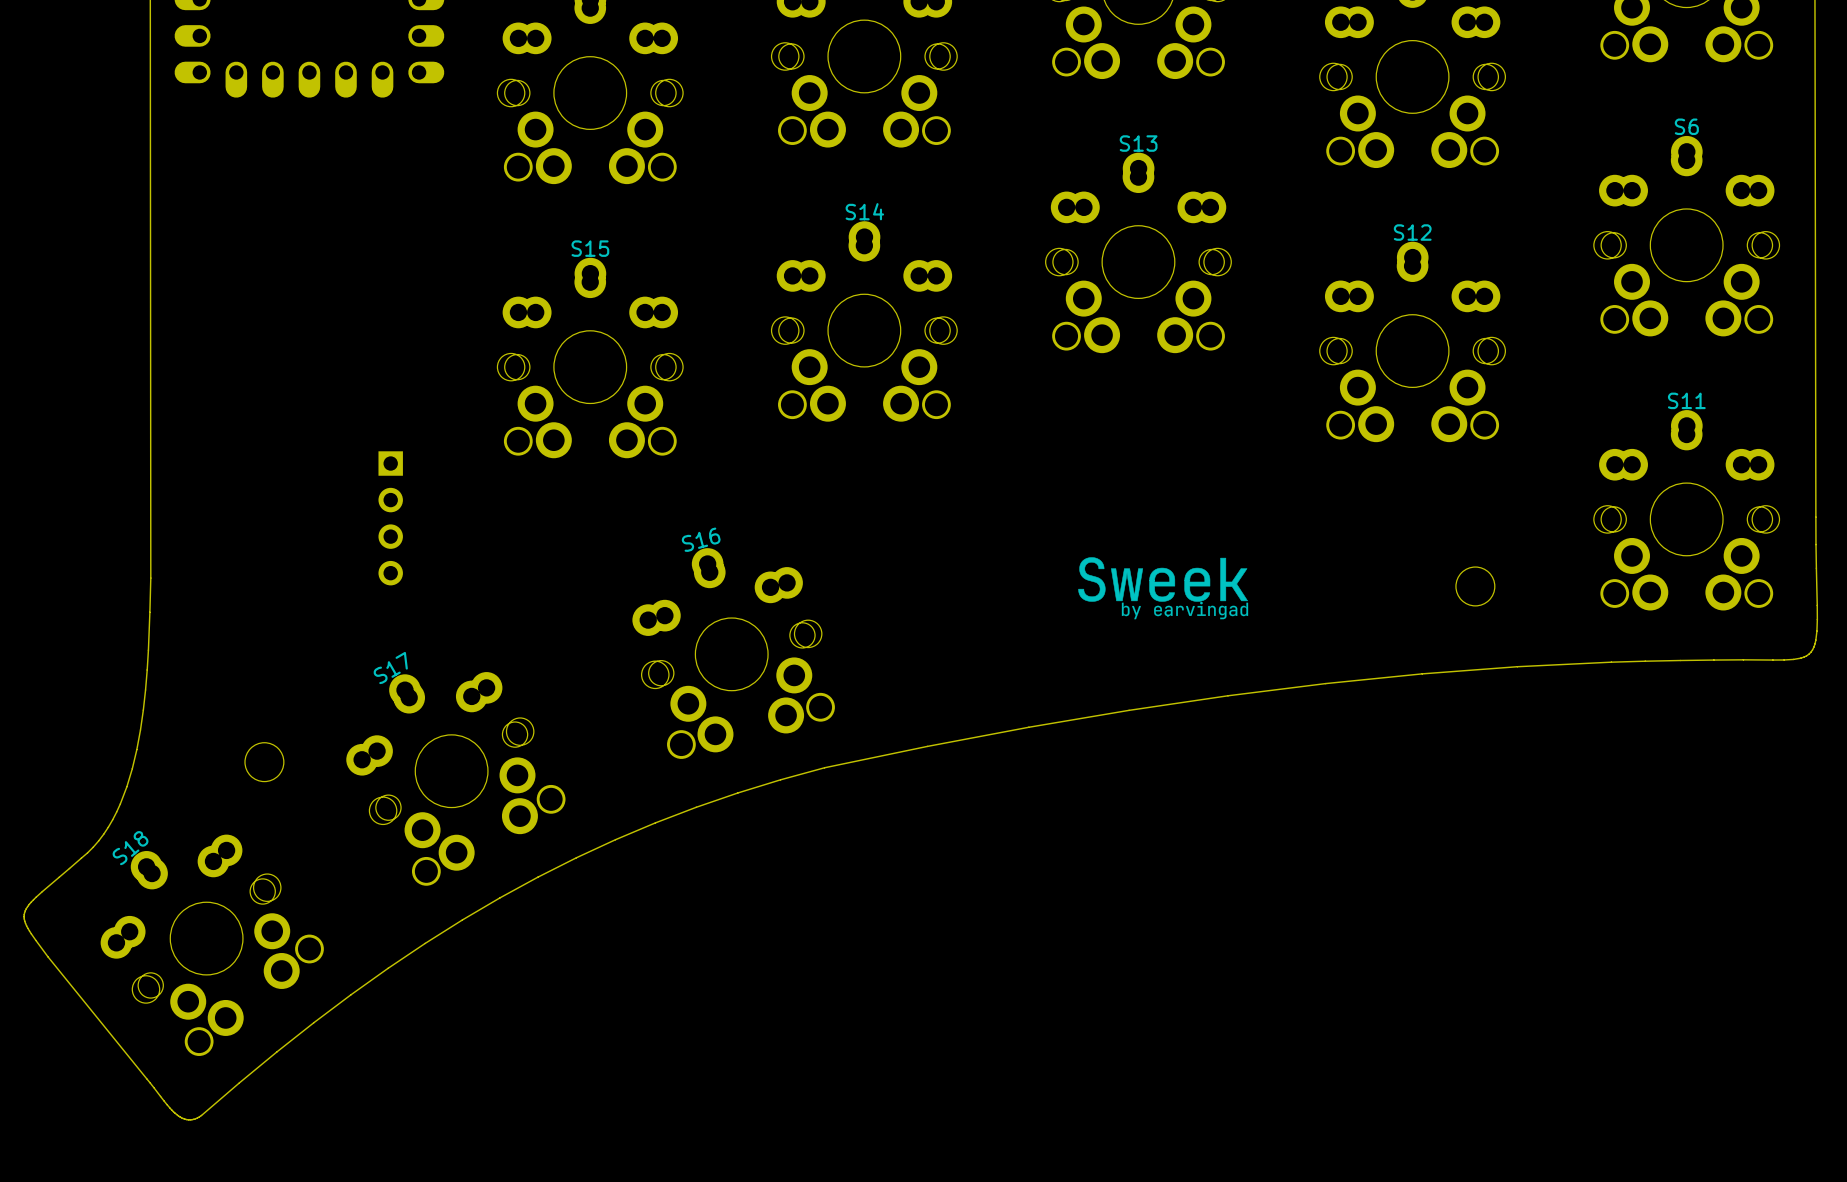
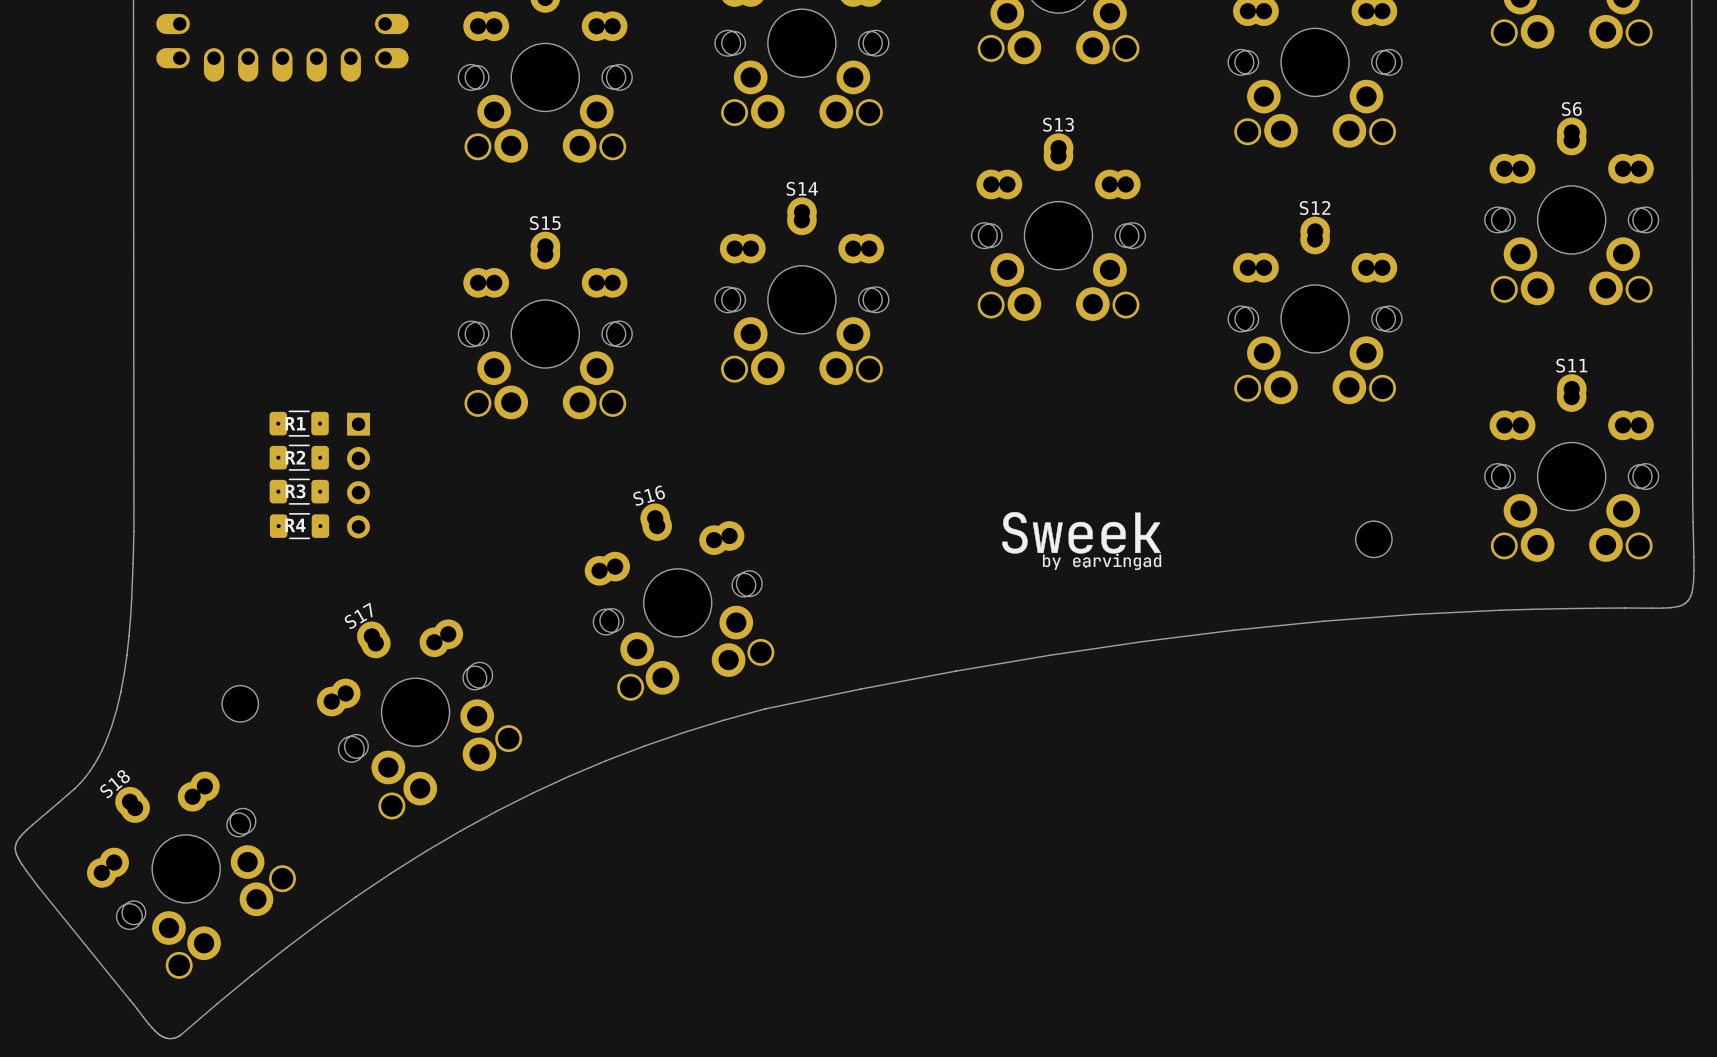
part: none -> (299, 423)
part: none -> (299, 457)
part: none -> (299, 491)
part: none -> (299, 526)

